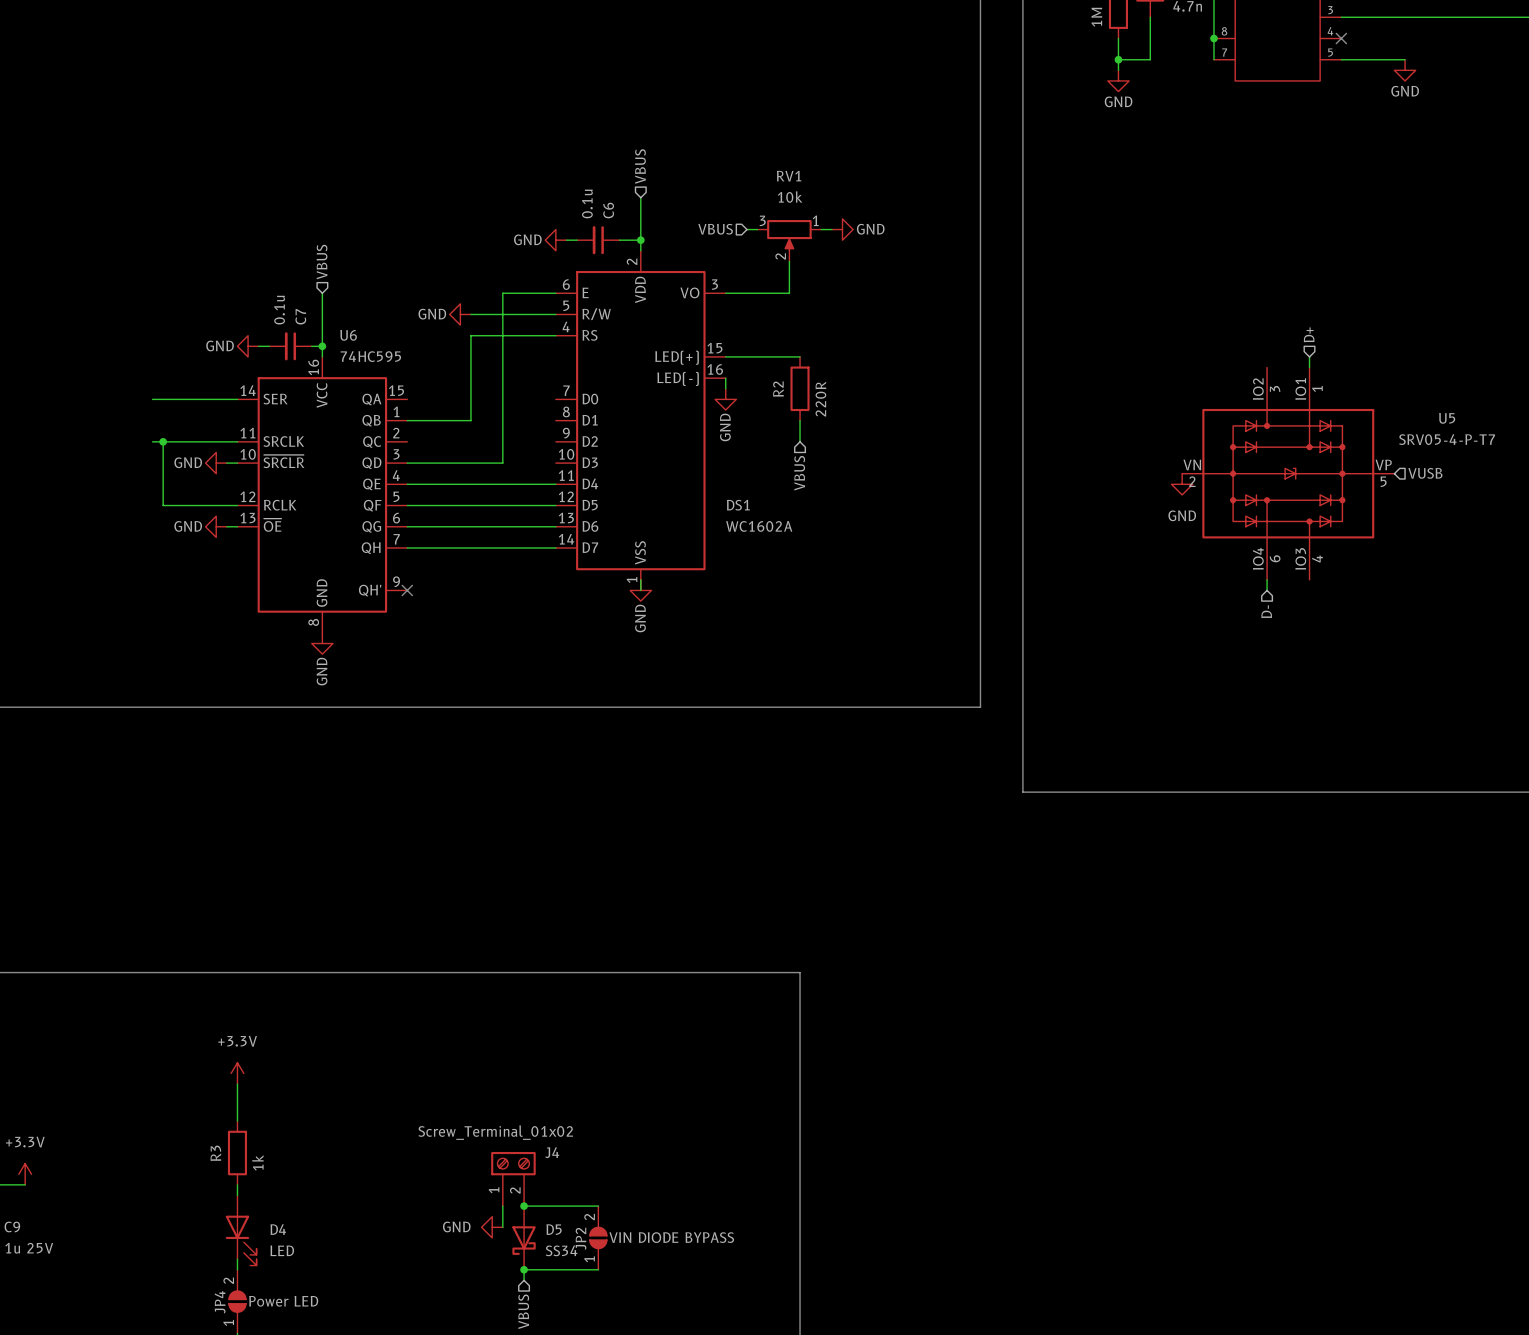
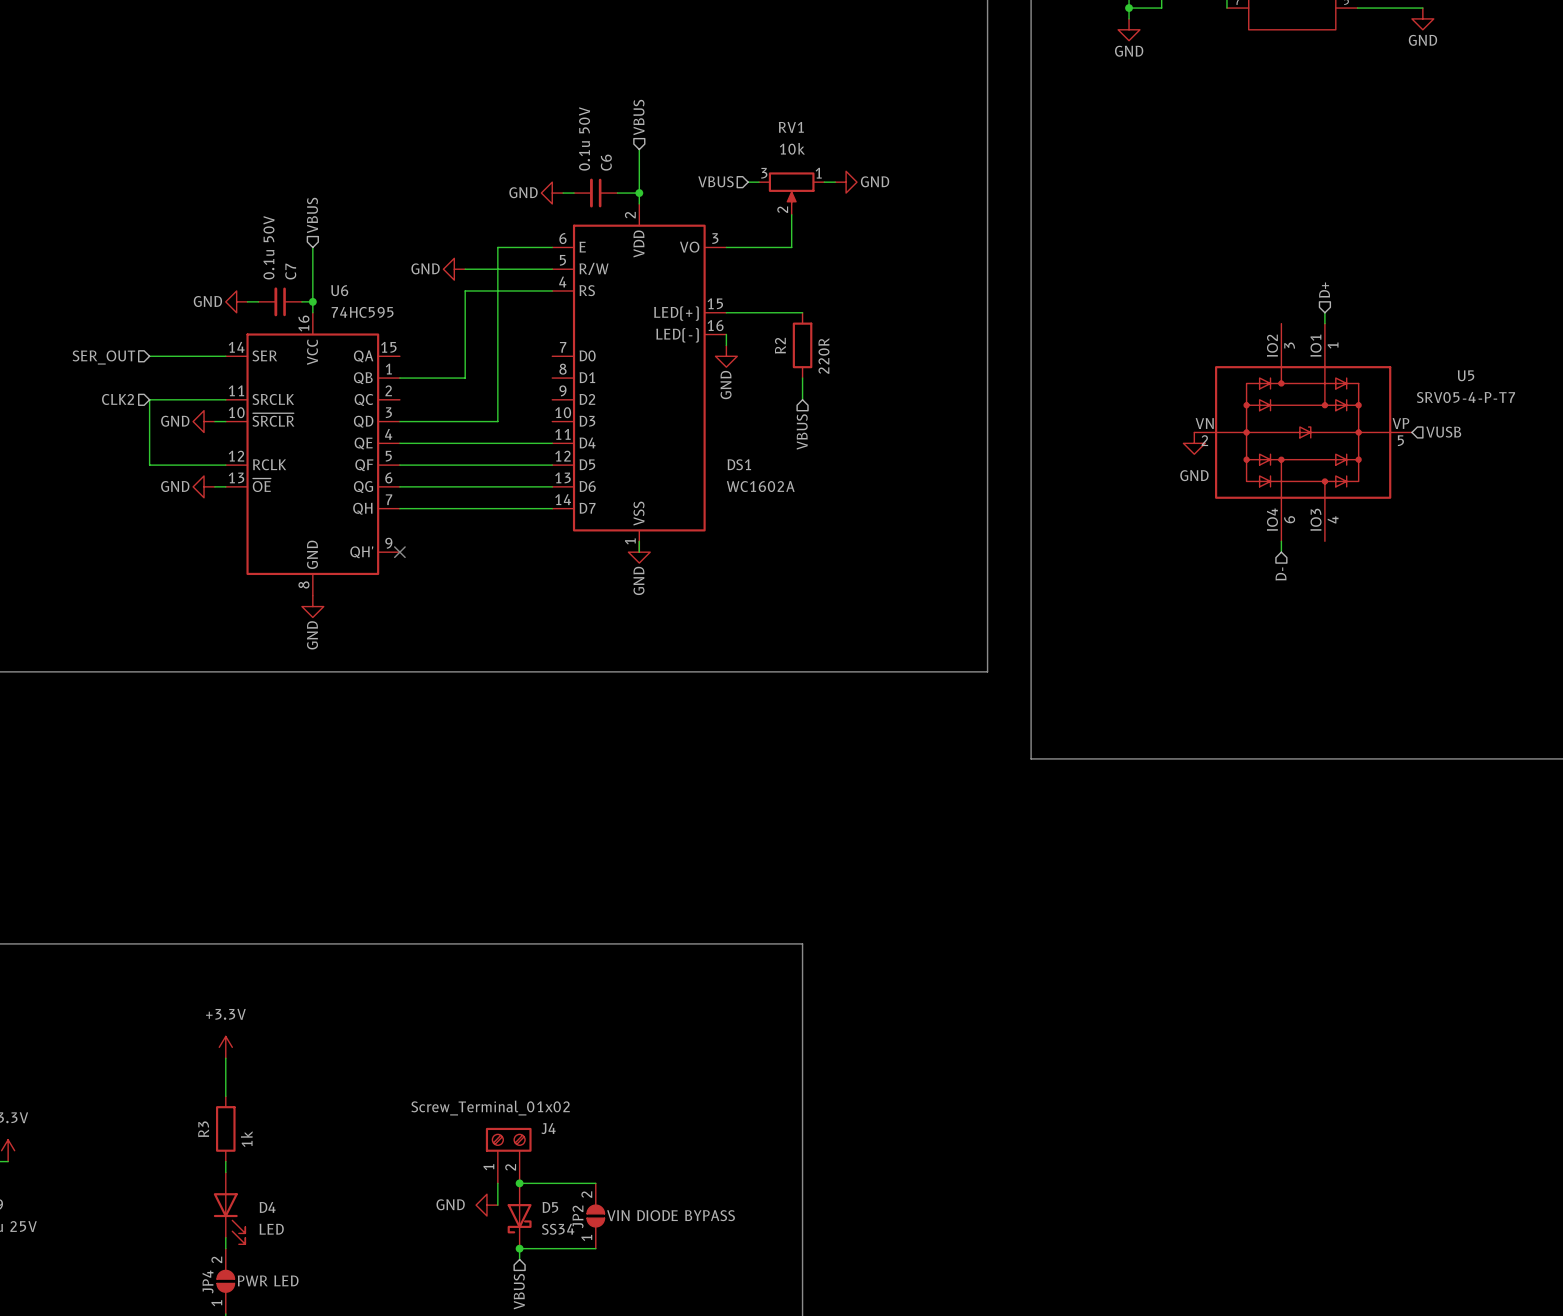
C6 value: 0.1u (587, 203) -> 0.1u 50V (584, 138)
C7 value: 0.1u (279, 310) -> 0.1u 50V (268, 247)
wire: (152, 399) (163, 399) -> none
hierarchical label: none -> SER_OUT (103, 357)
hierarchical label: none -> CLK2 (118, 399)
wire: (152, 441) (163, 441) -> none
junction: (163, 441) -> none
JP4 value: Power LED (283, 1301) -> PWR LED (268, 1280)

